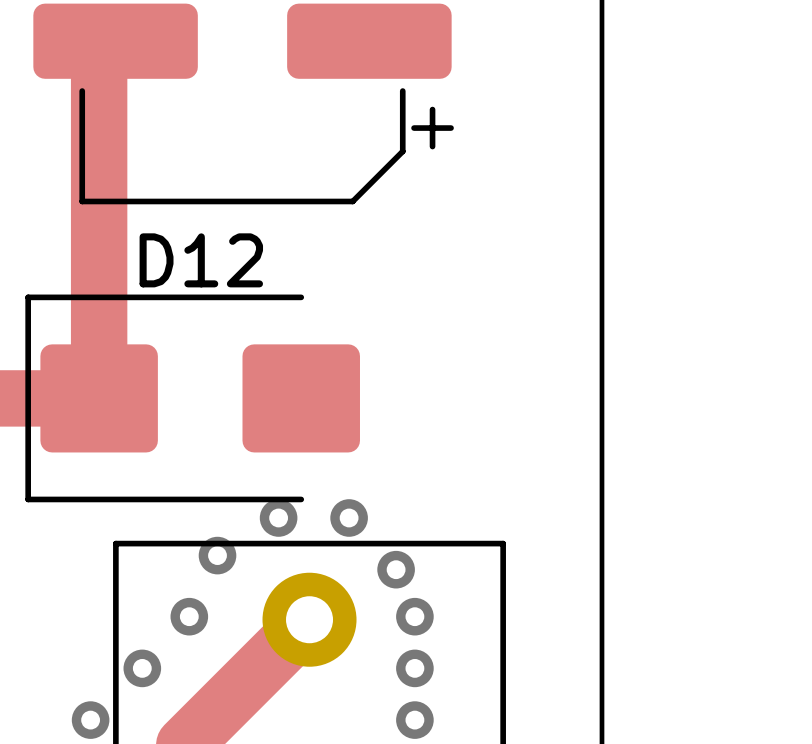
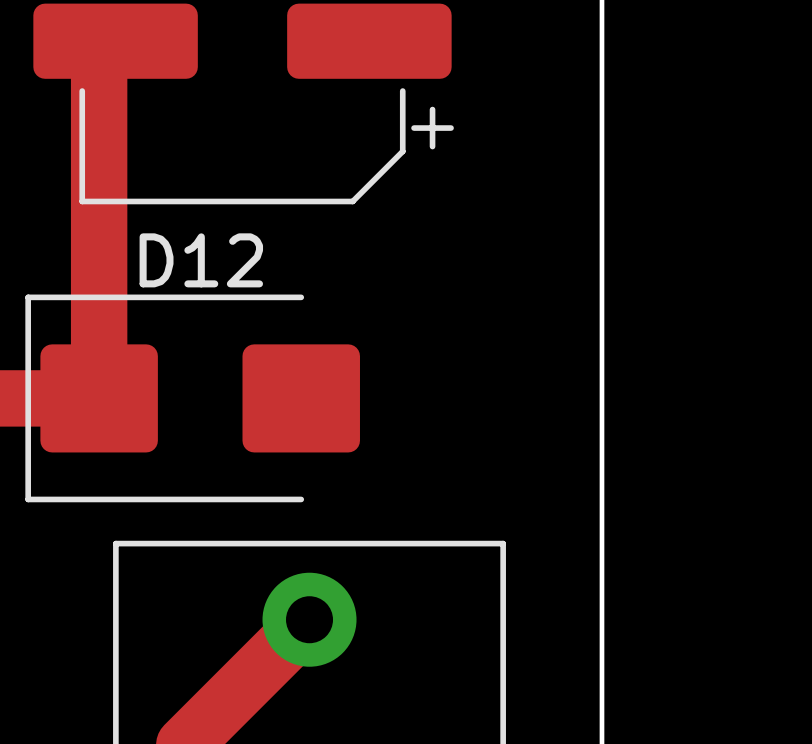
via: (278, 517) -> none
via: (349, 517) -> none
via: (217, 555) -> none
via: (396, 569) -> none
via: (189, 616) -> none
via: (414, 616) -> none
via: (142, 668) -> none
via: (414, 668) -> none
via: (90, 720) -> none
via: (414, 720) -> none

